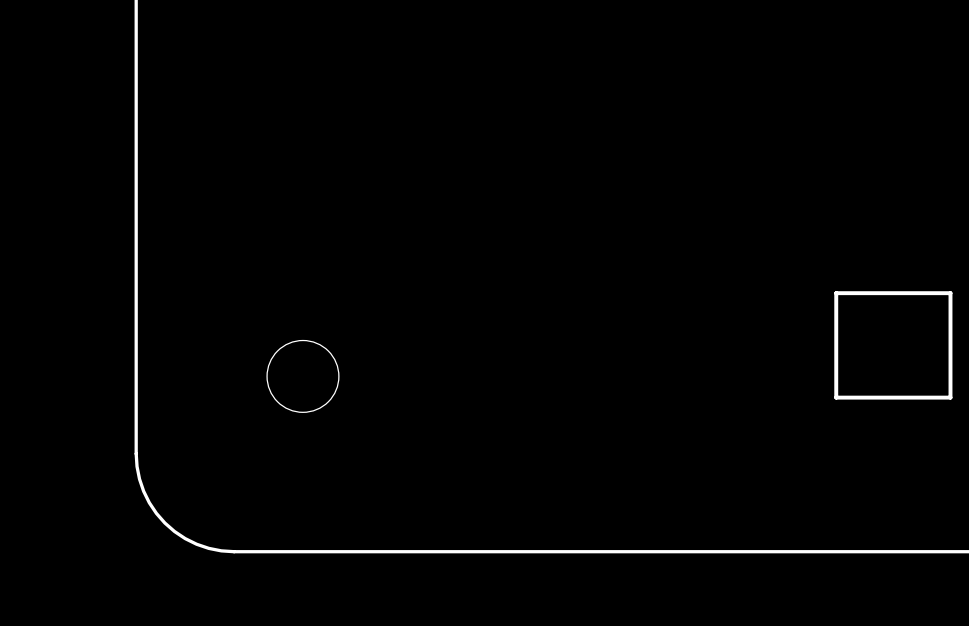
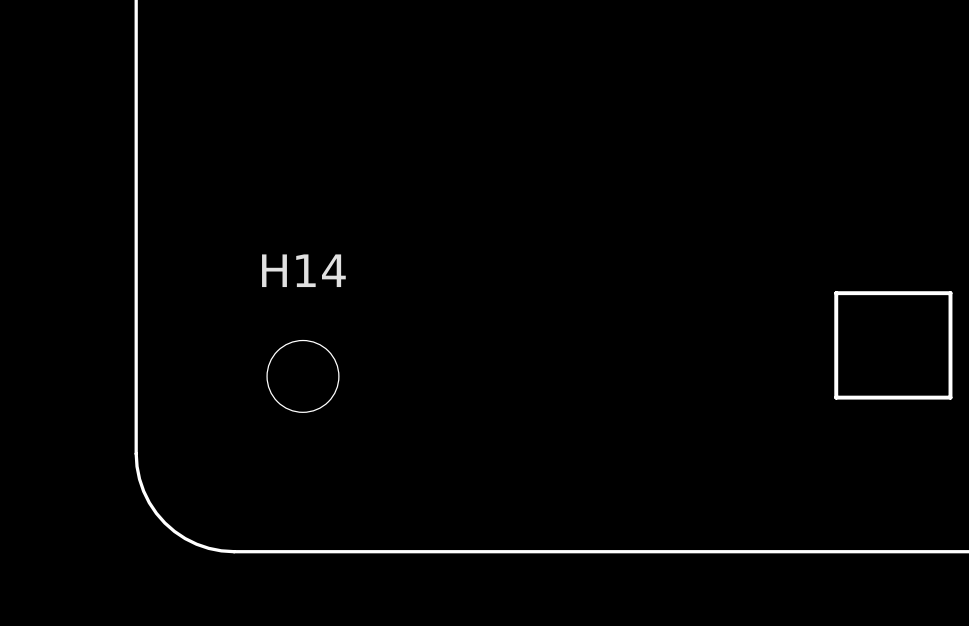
H14 name: none -> H14 (303, 270)

